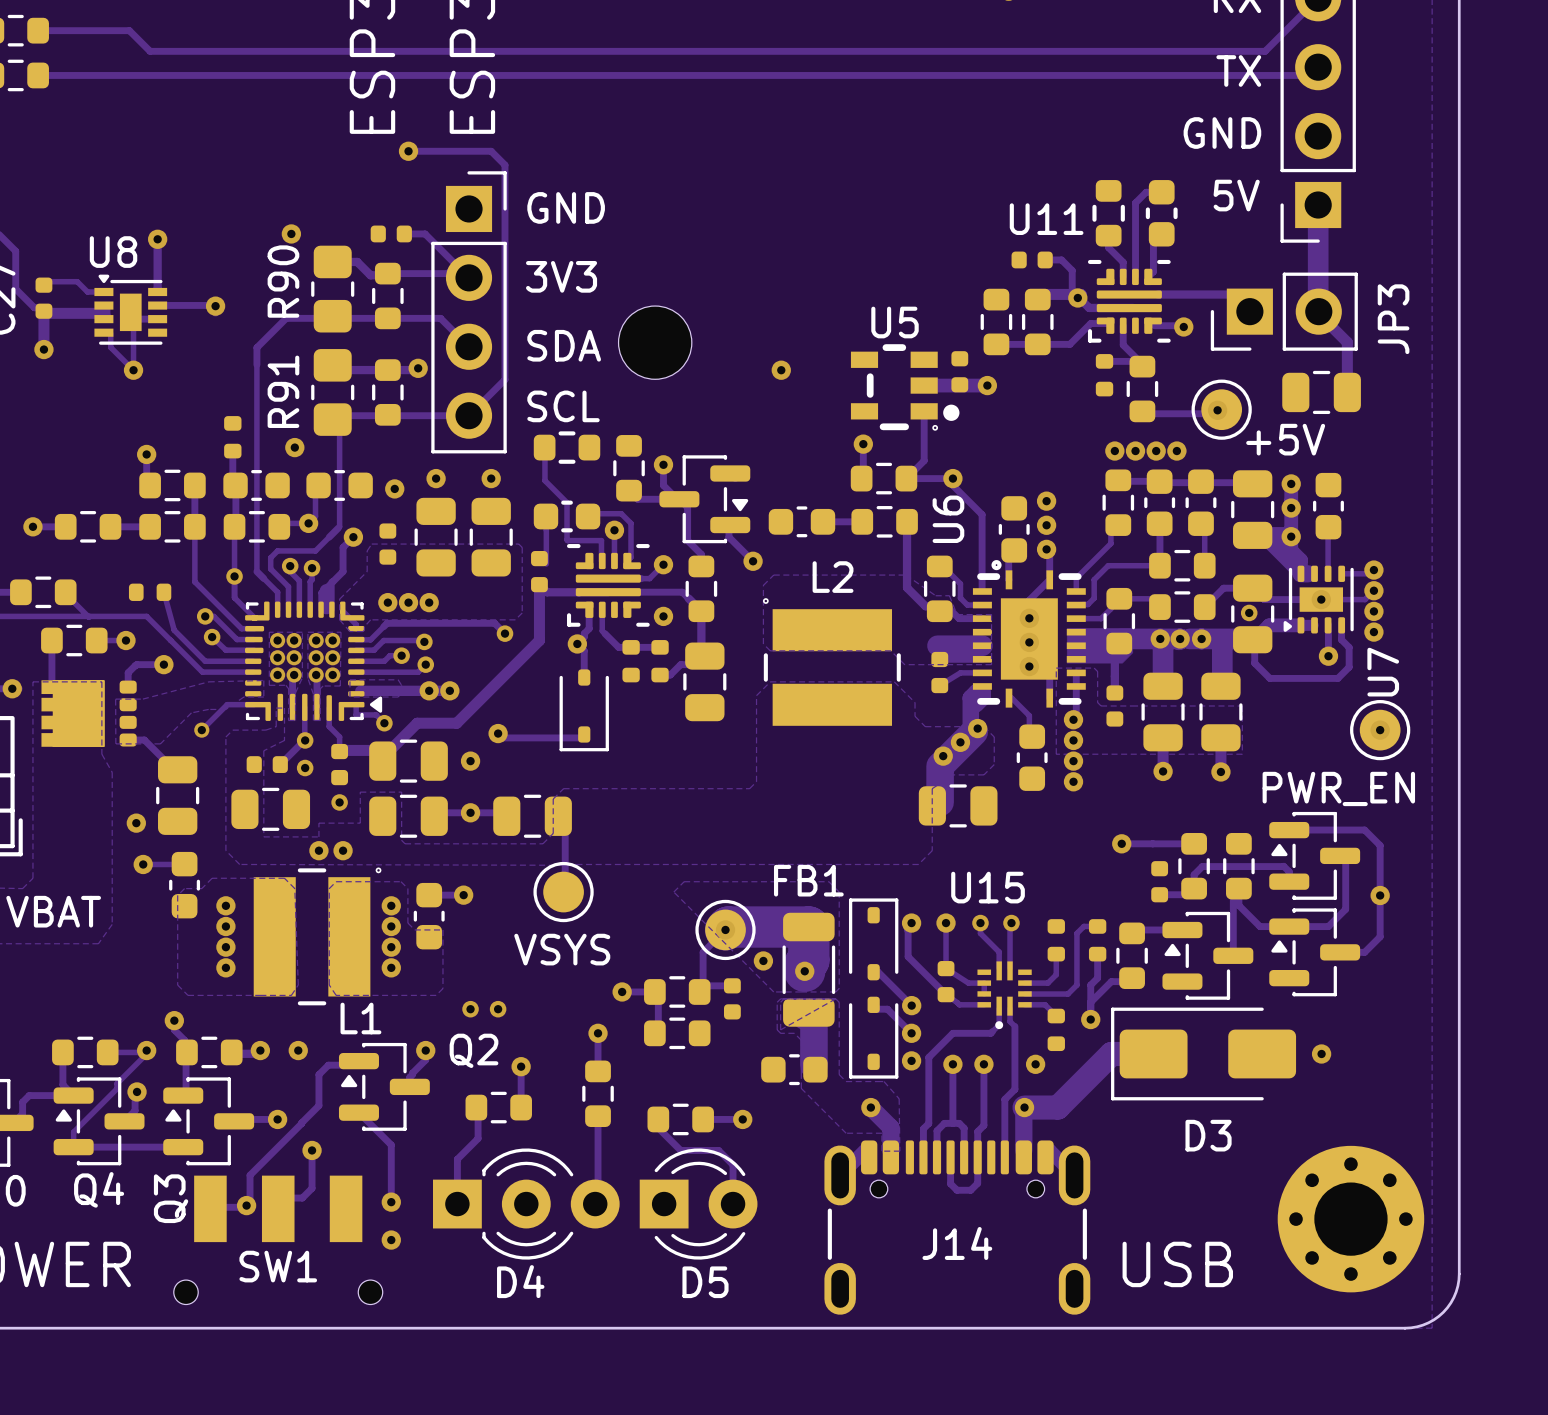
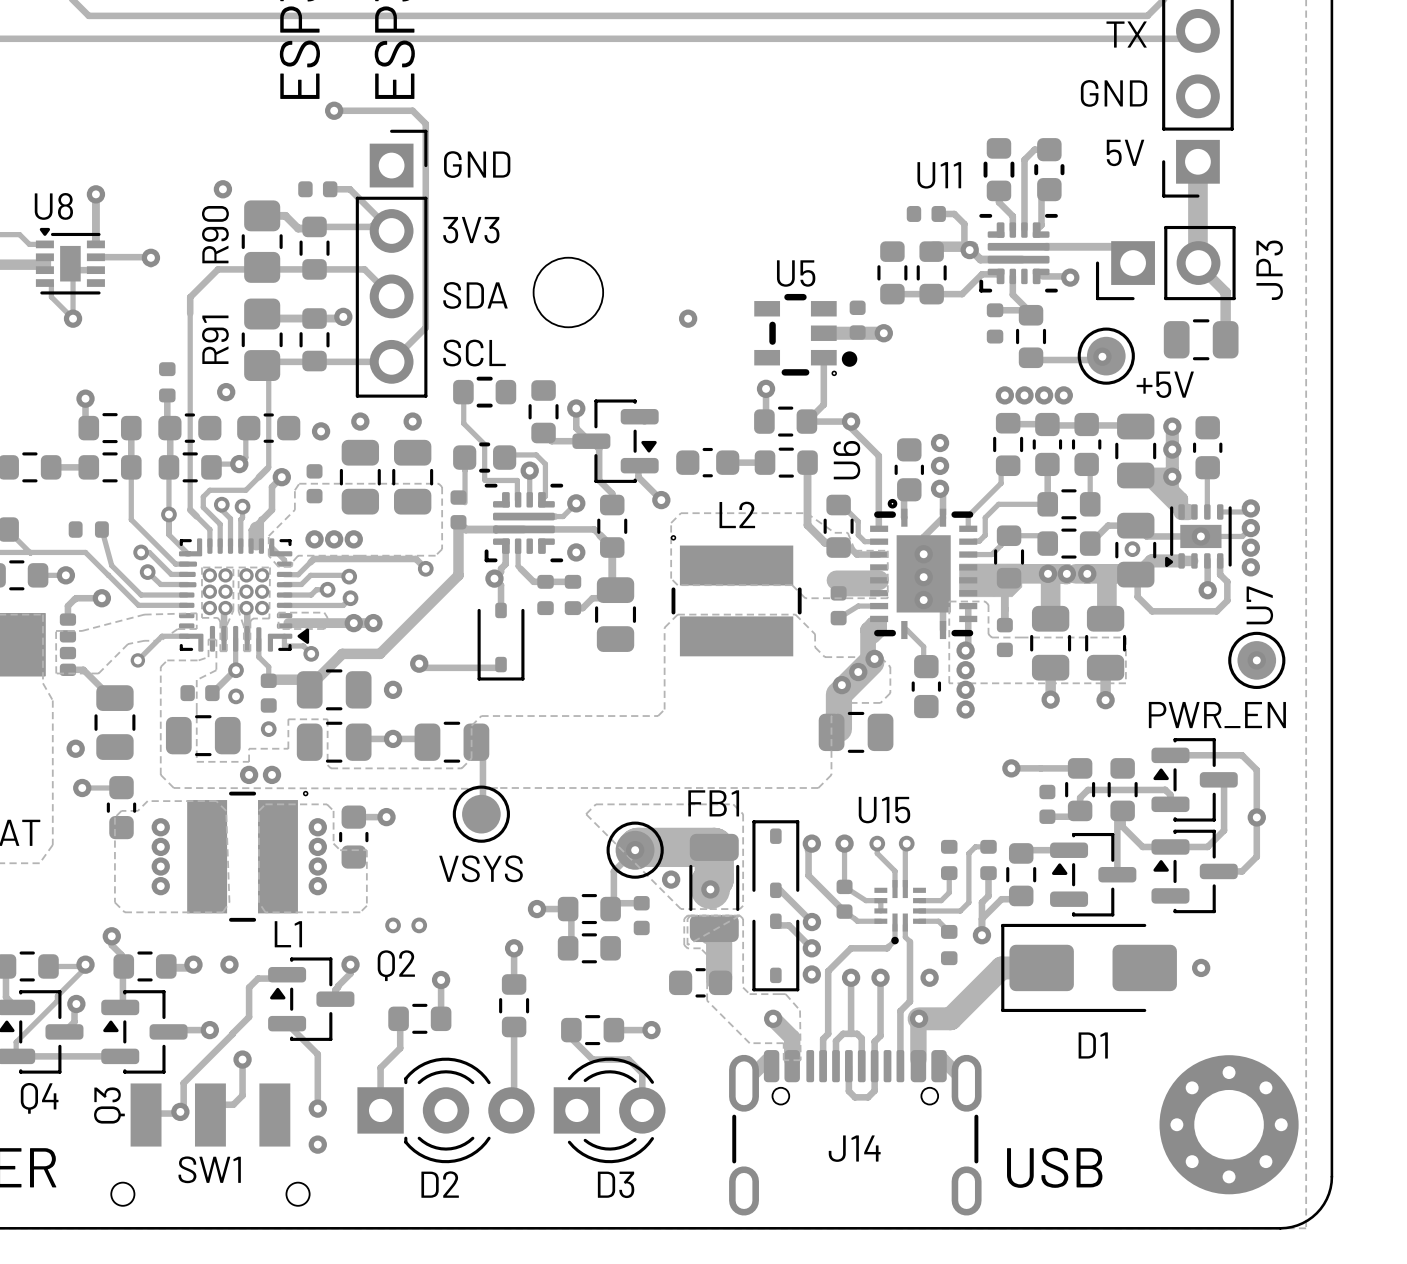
D3 name: D3 (1208, 1135) -> D1 (1093, 1045)
D4 name: D4 (520, 1281) -> D2 (440, 1184)
D5 name: D5 (705, 1282) -> D3 (616, 1184)

